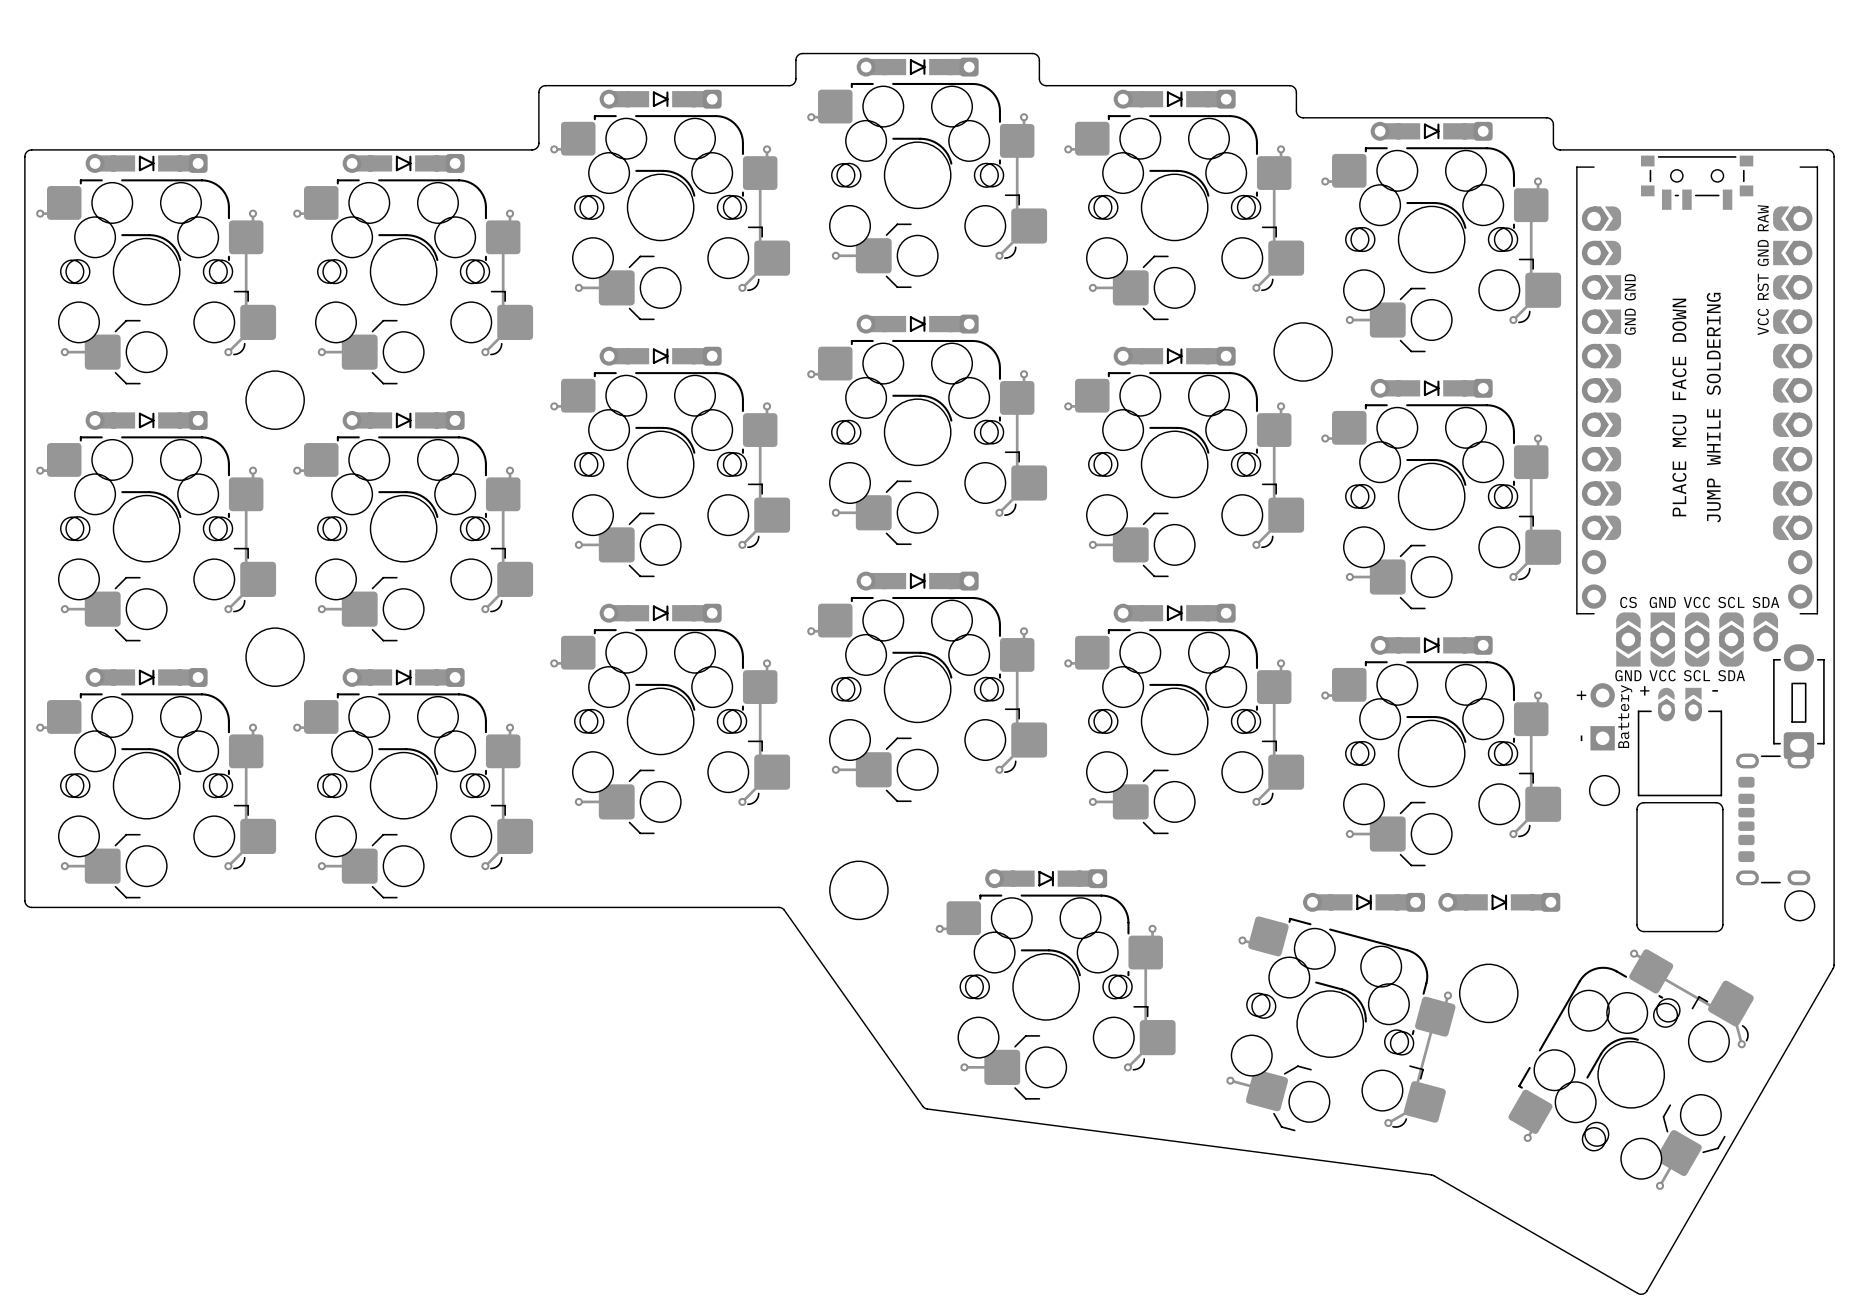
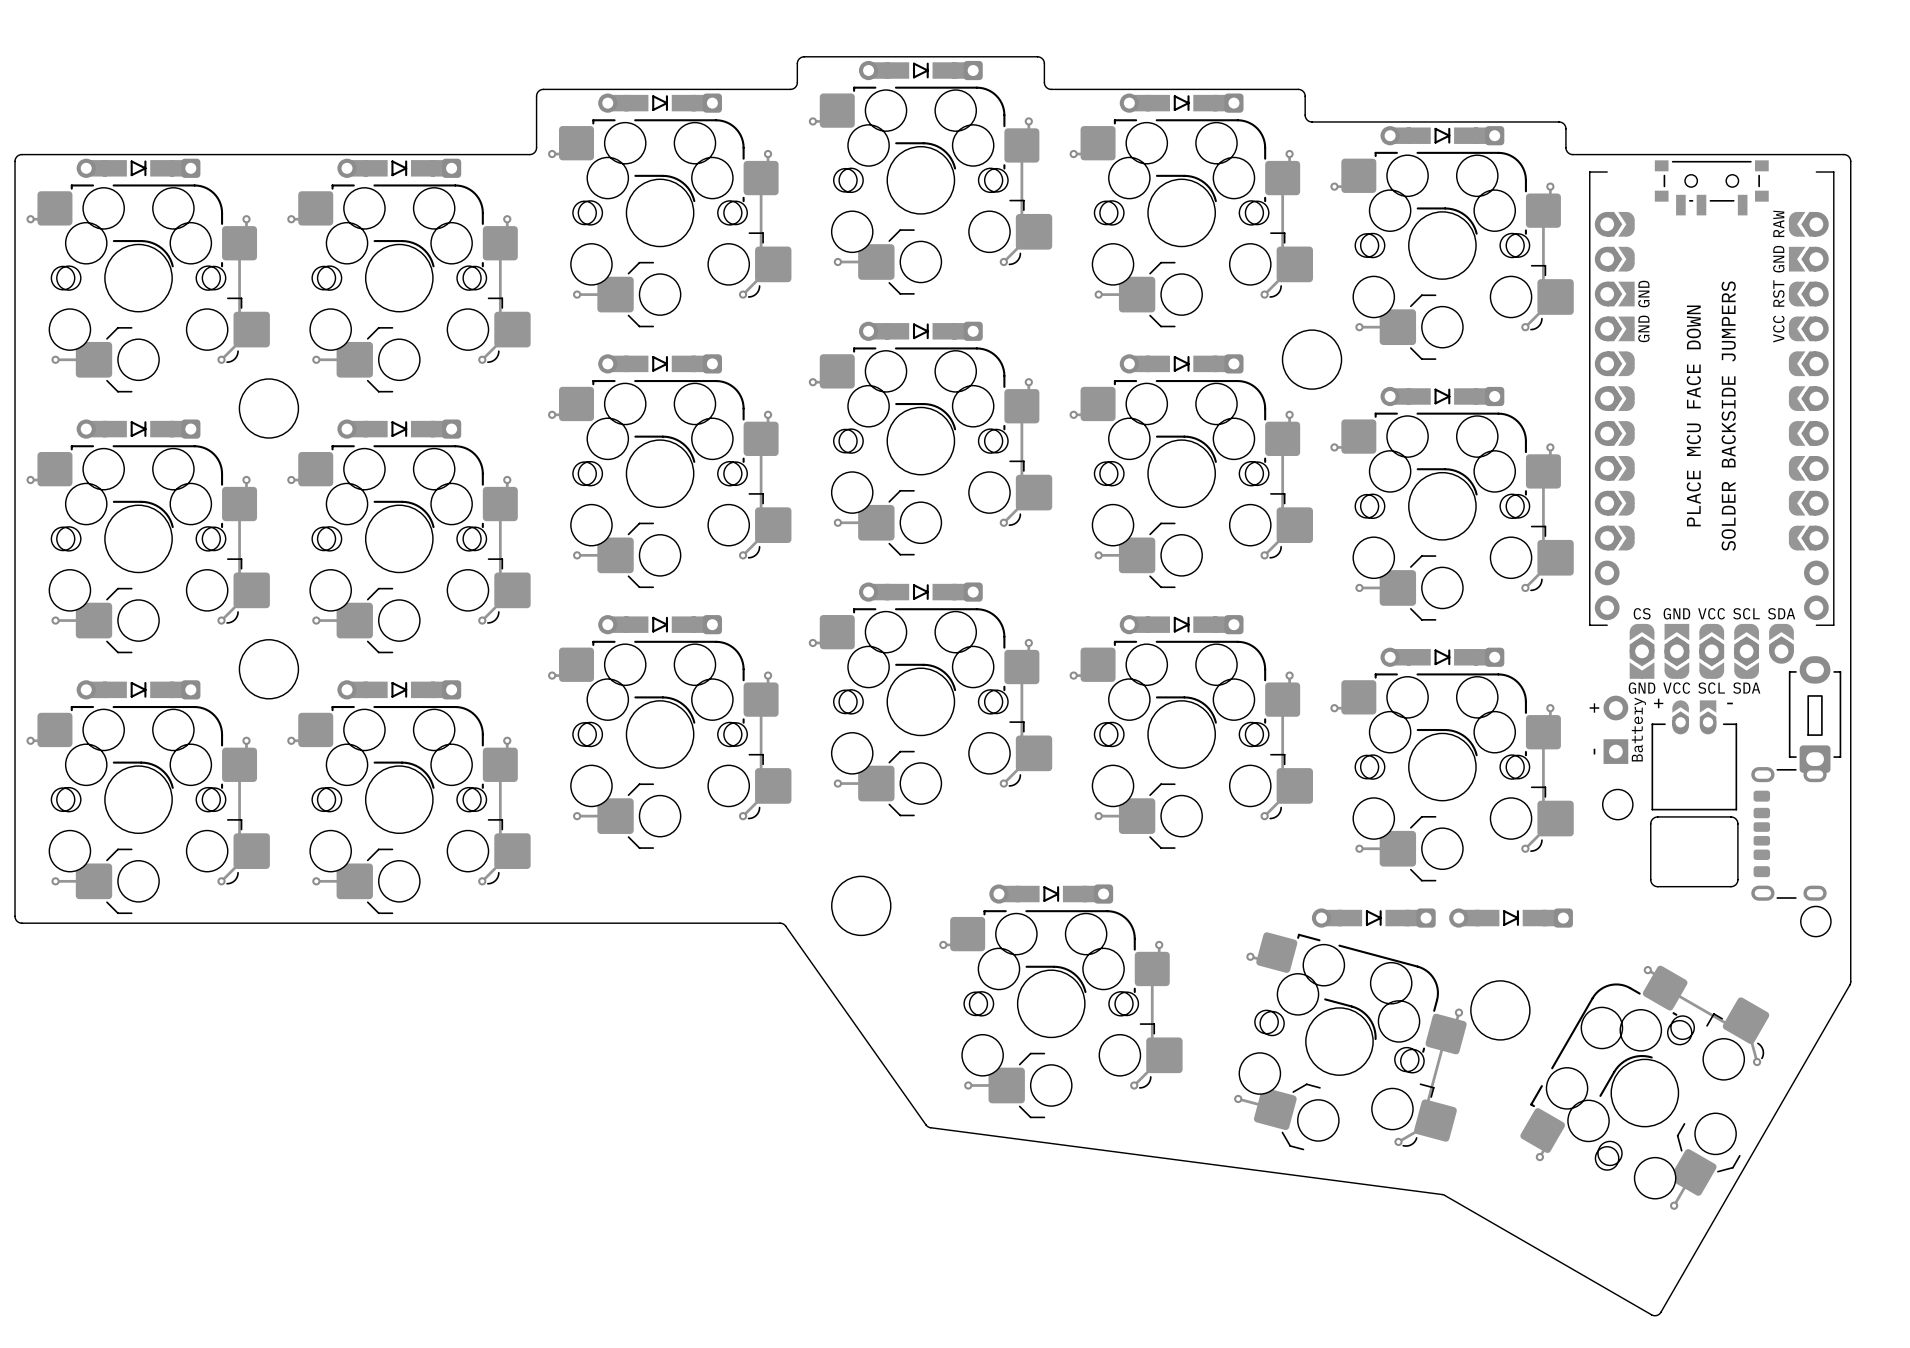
part text: JUMP WHILE SOLDERING (1713, 407) -> SOLDER BACKSIDE JUMPERS (1728, 416)
board edge: (1637, 864) (1637, 925) (1639, 930) (1643, 931) (1720, 930) (1722, 924) (1722, 864) -> (1650, 879) (1652, 884) (1657, 886) (1731, 886) (1736, 883) (1737, 879)

